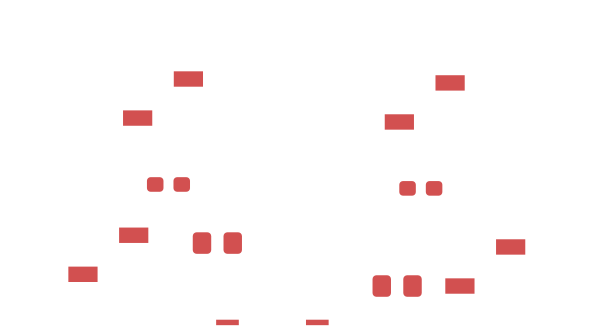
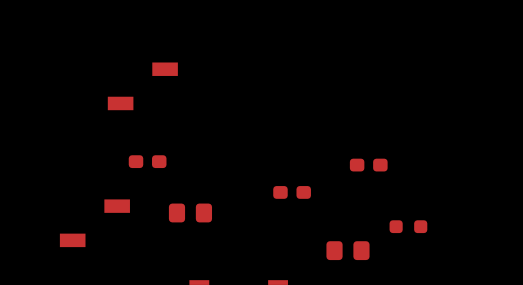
part: (424, 102) -> none
part: none -> (292, 192)
part: none -> (408, 226)
part: (485, 266) -> none

